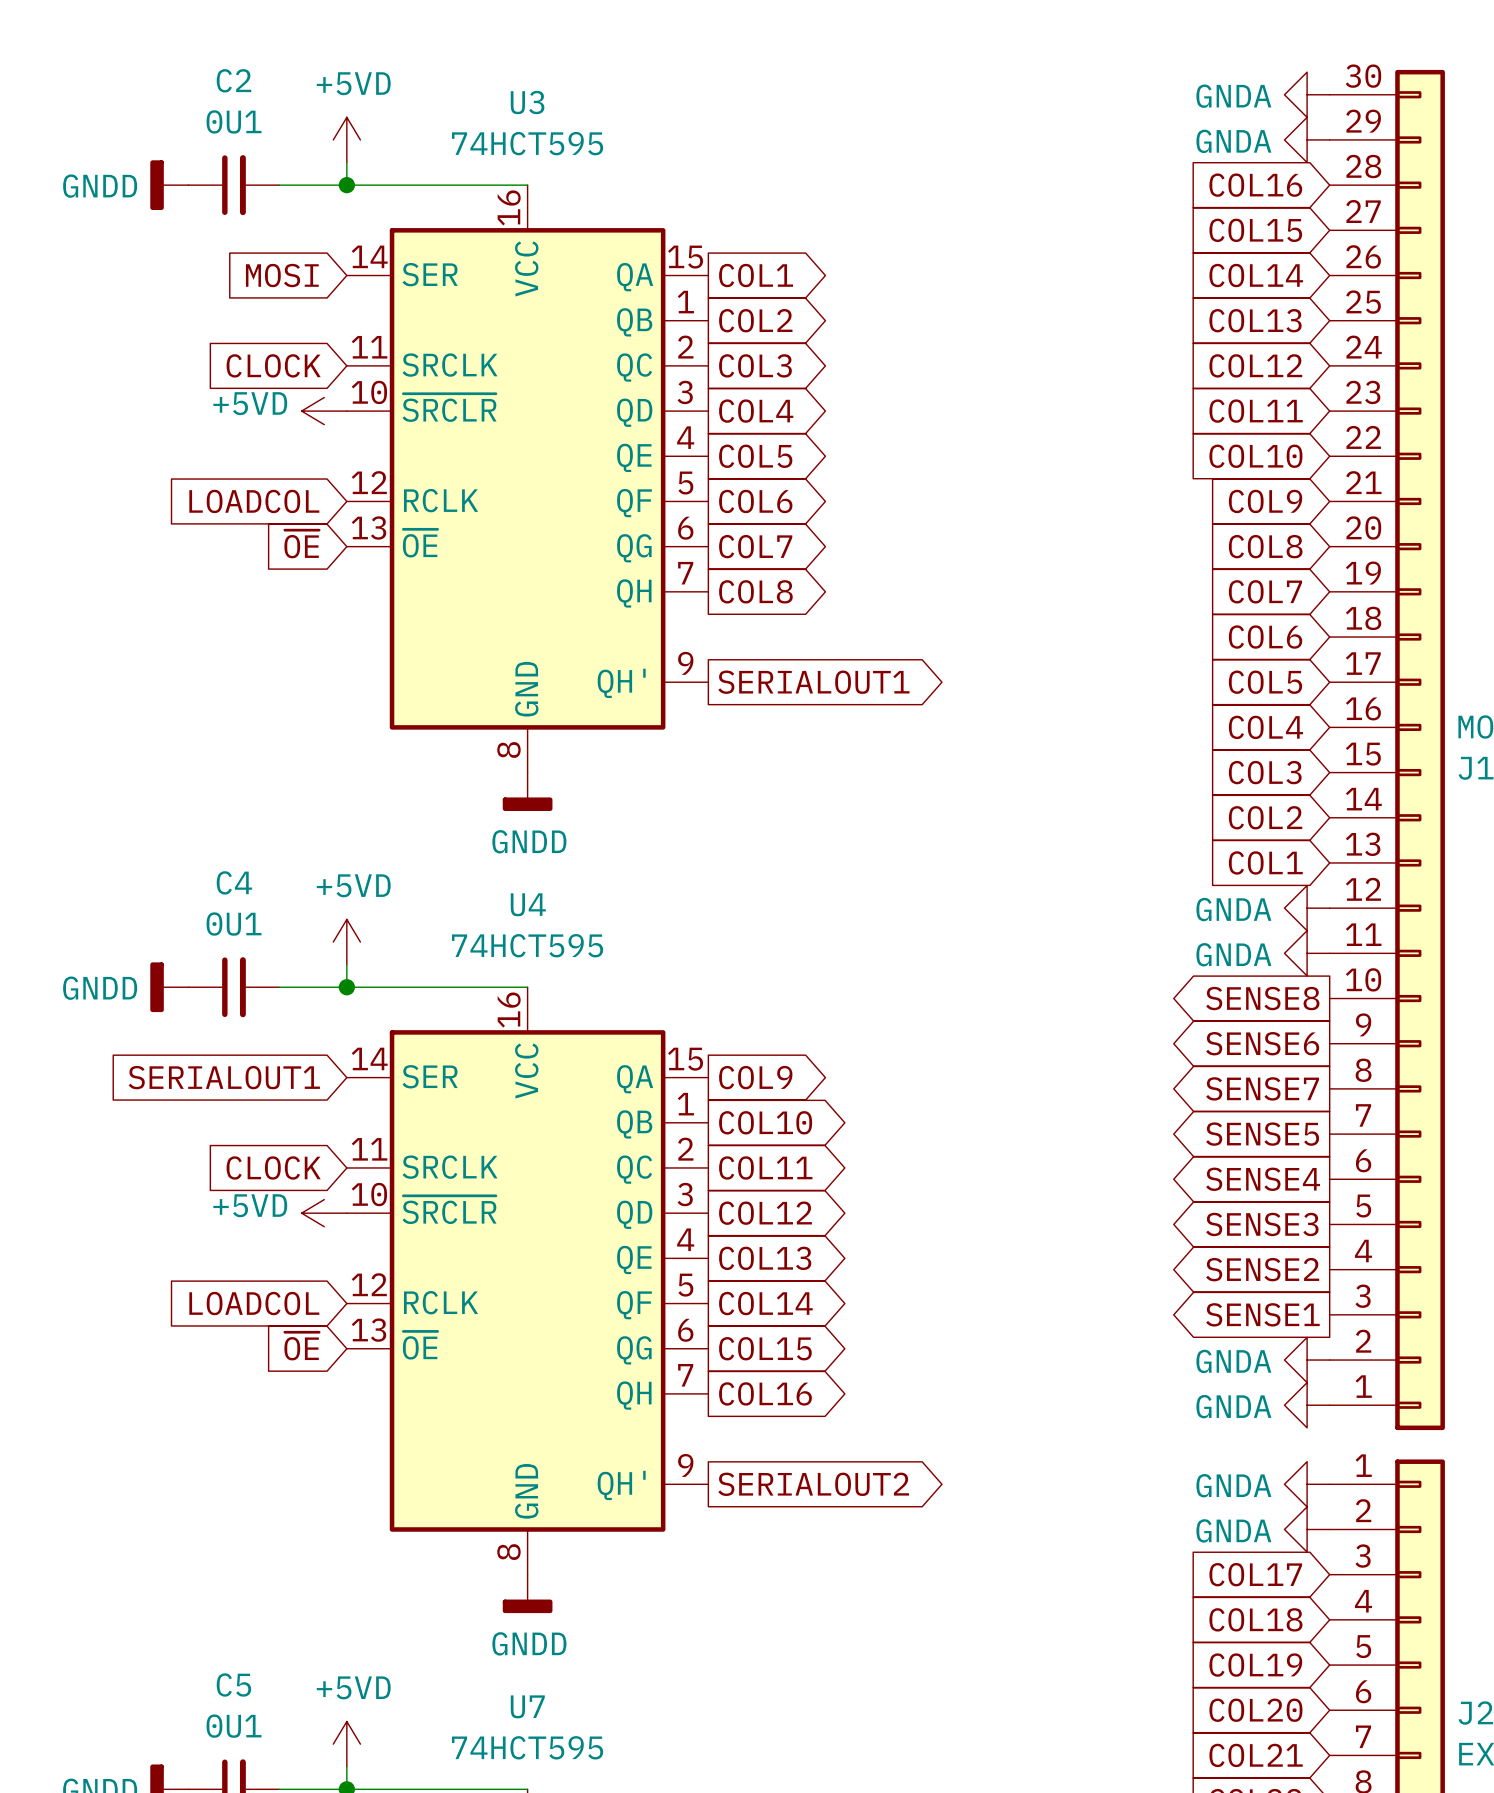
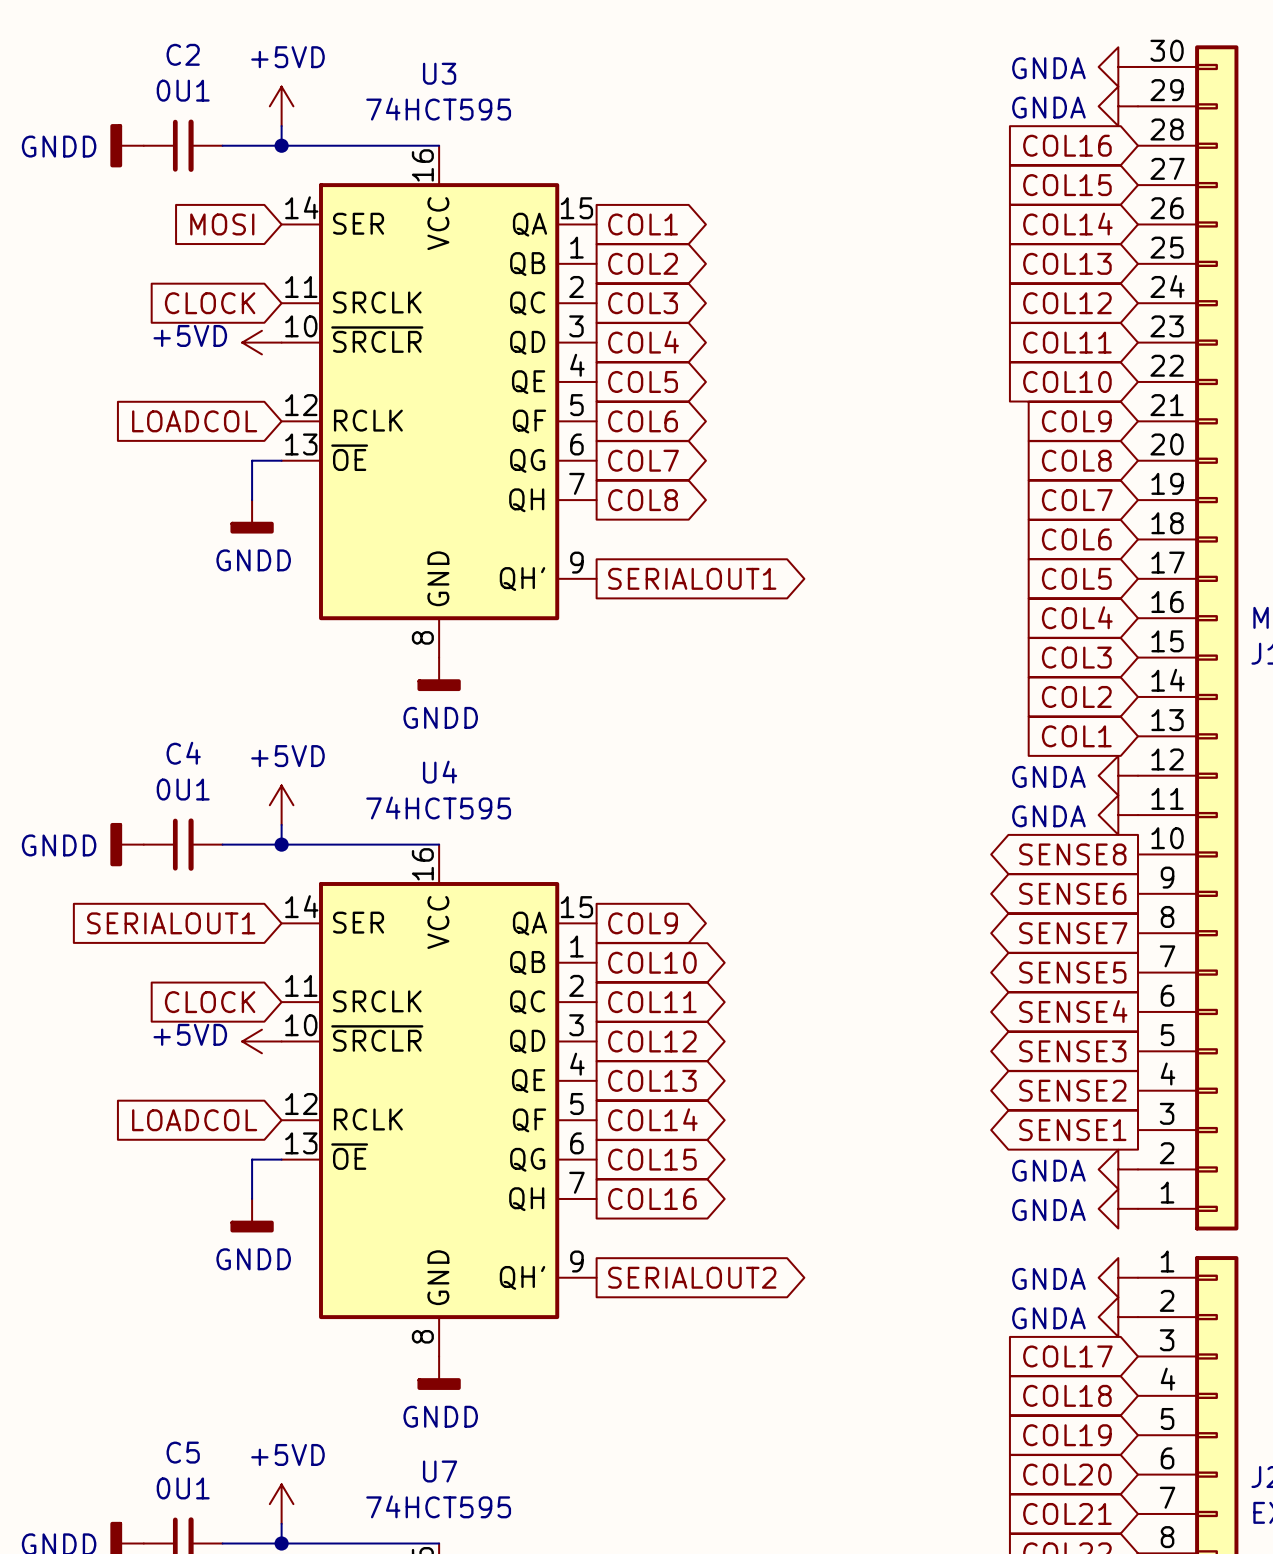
global label: ~{OE} (301, 544) -> none
wire: none -> (281, 460) (252, 460) (252, 500)
power symbol: none -> GNDD (252, 516)
global label: ~{OE} (301, 1346) -> none
wire: none -> (281, 1159) (252, 1159) (252, 1198)
power symbol: none -> GNDD (252, 1215)

